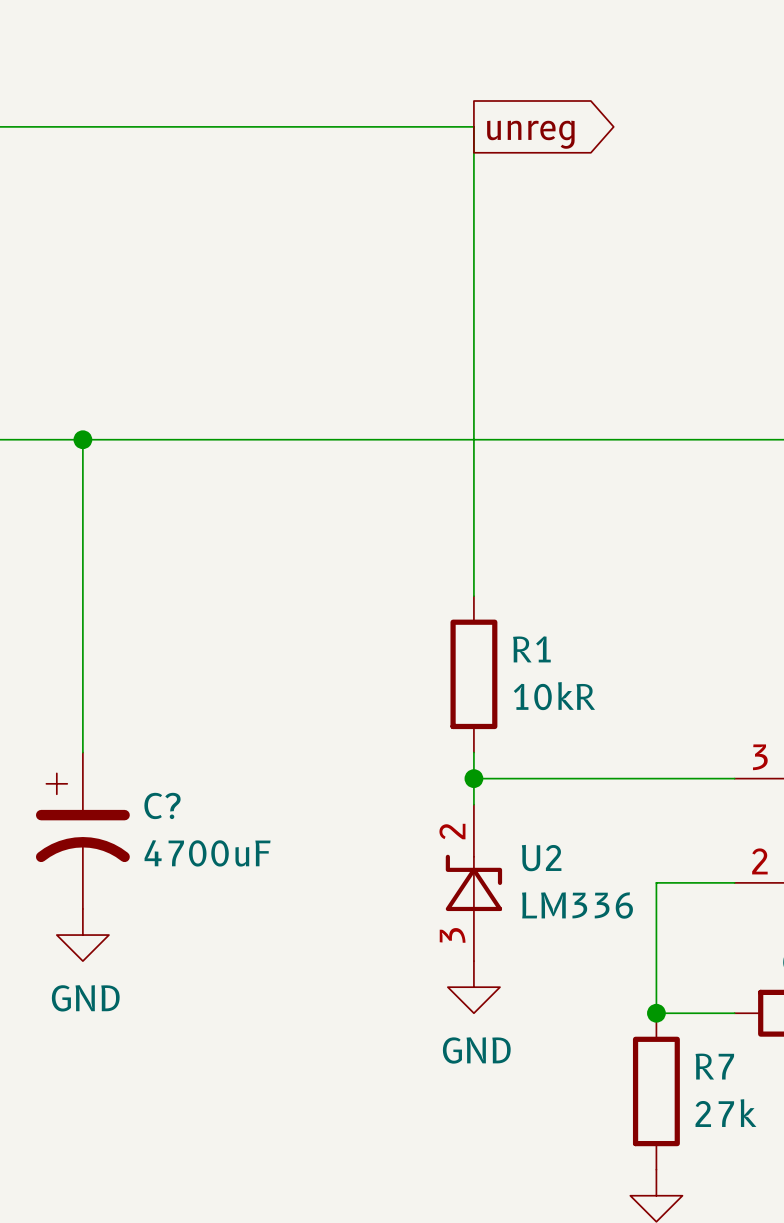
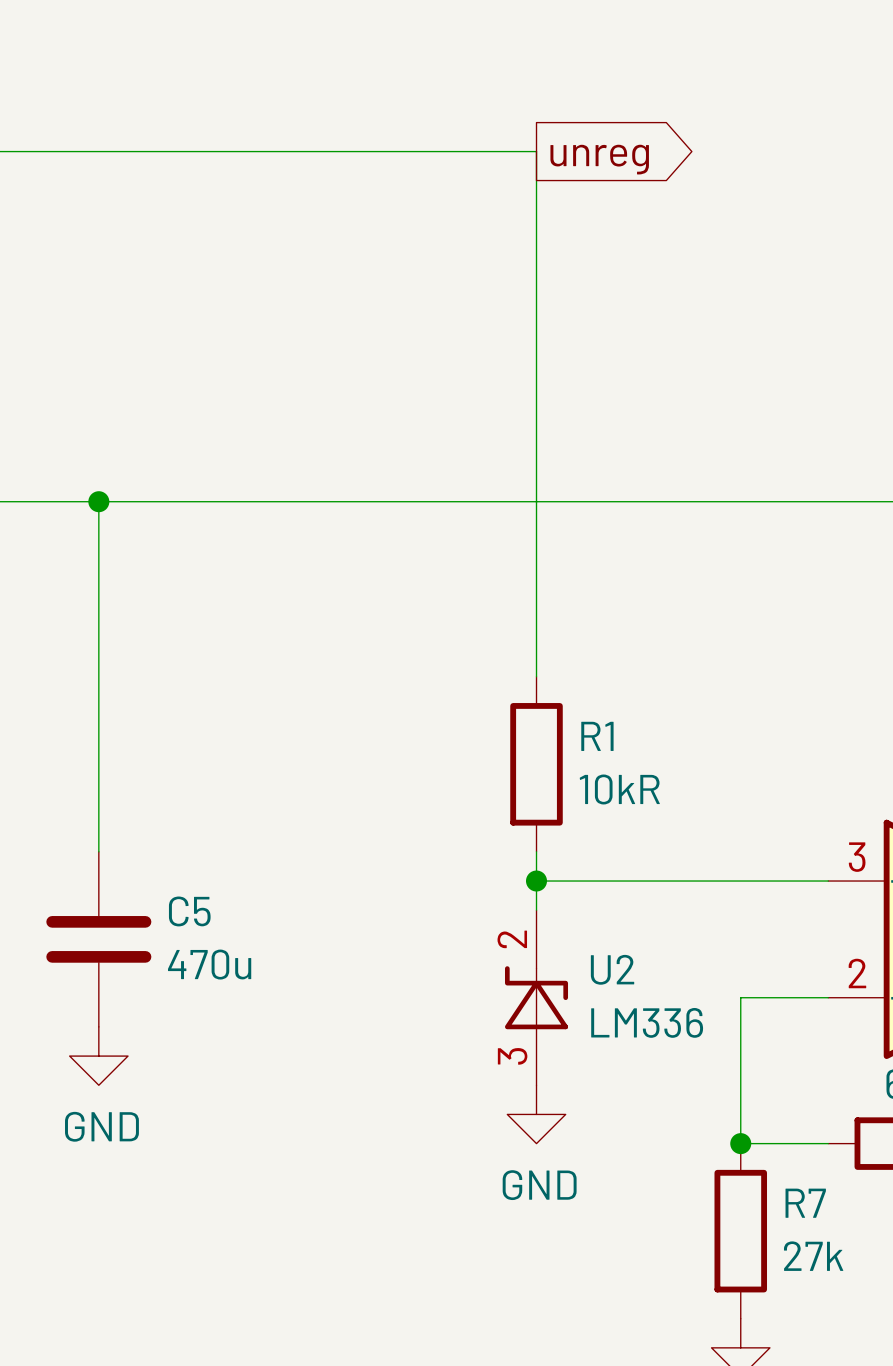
C?: 4700uF (82, 830) -> none
C5: none -> 470u (98, 939)

